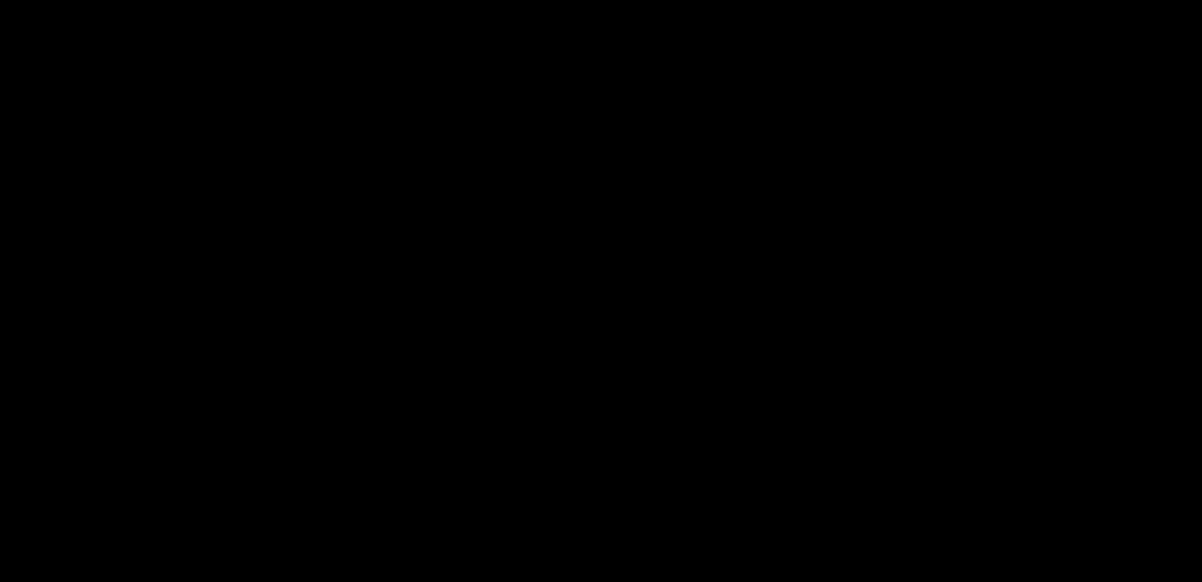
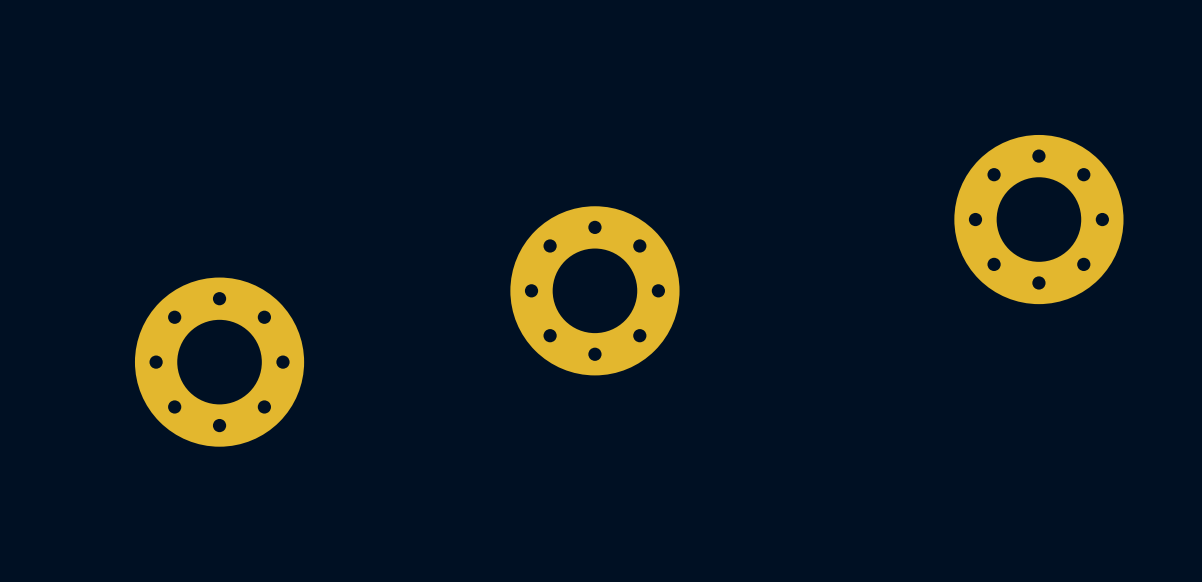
part: none -> (1038, 219)
part: none -> (594, 290)
part: none -> (219, 362)

